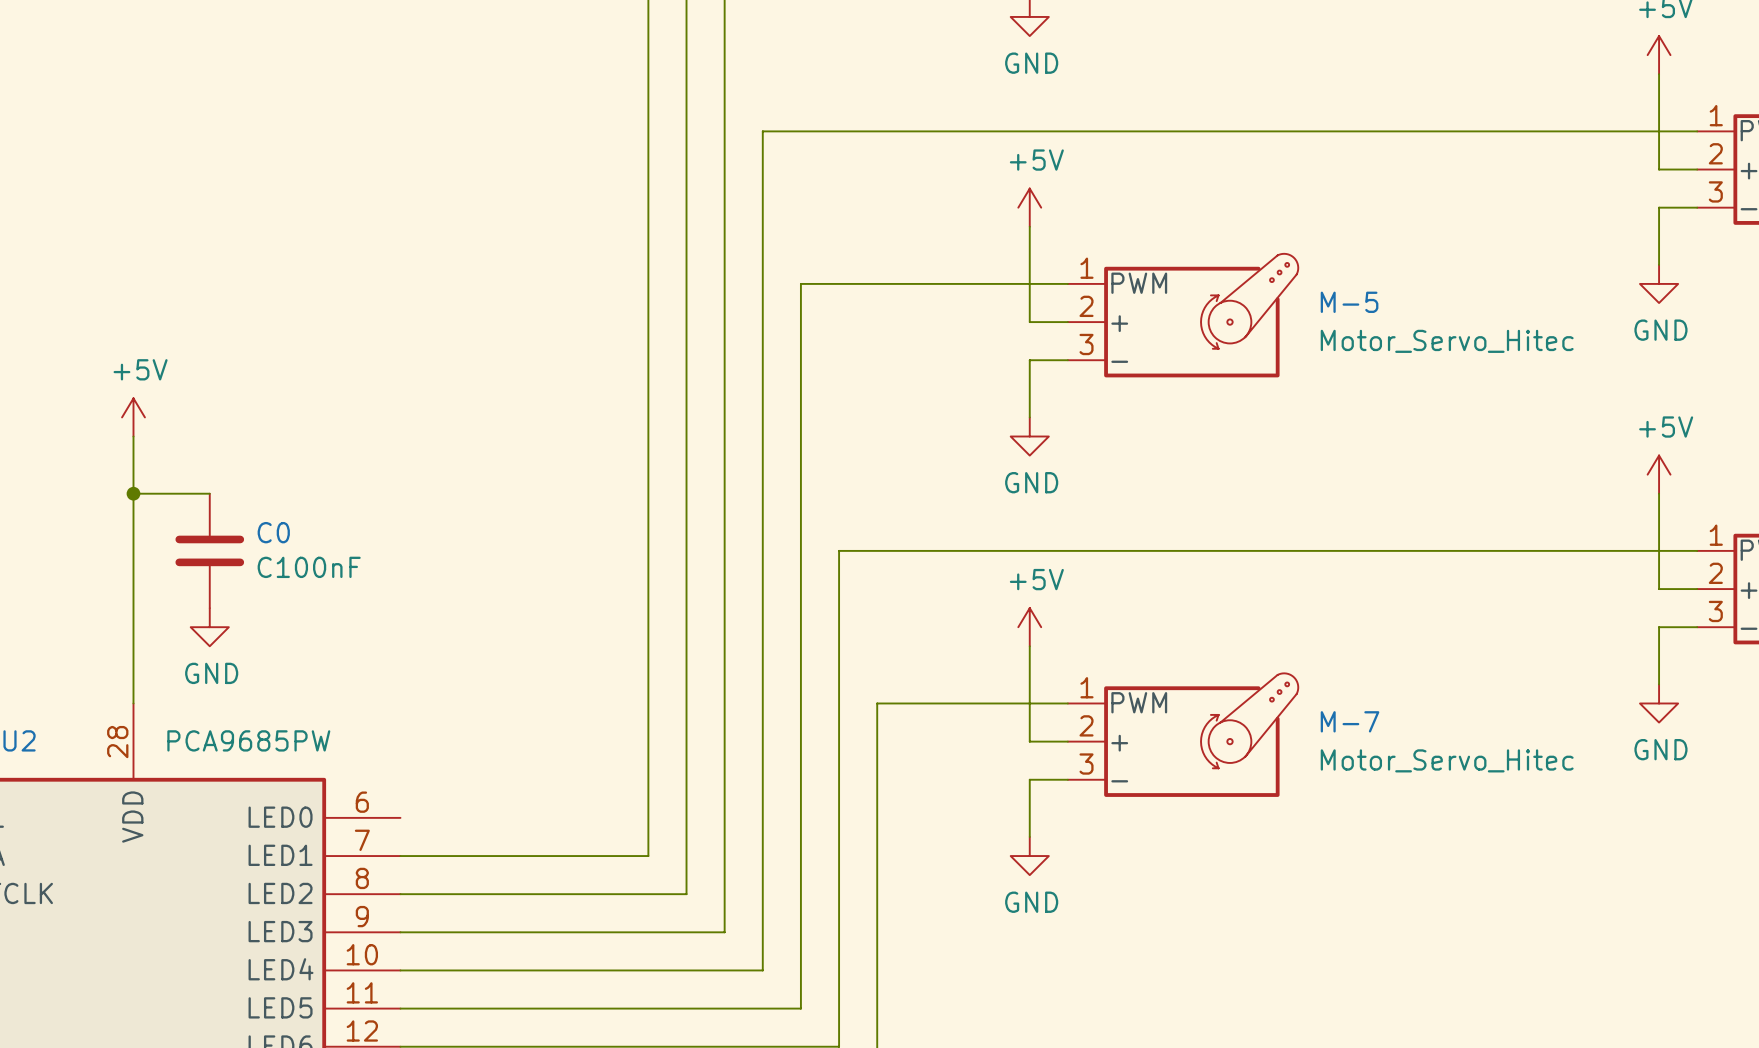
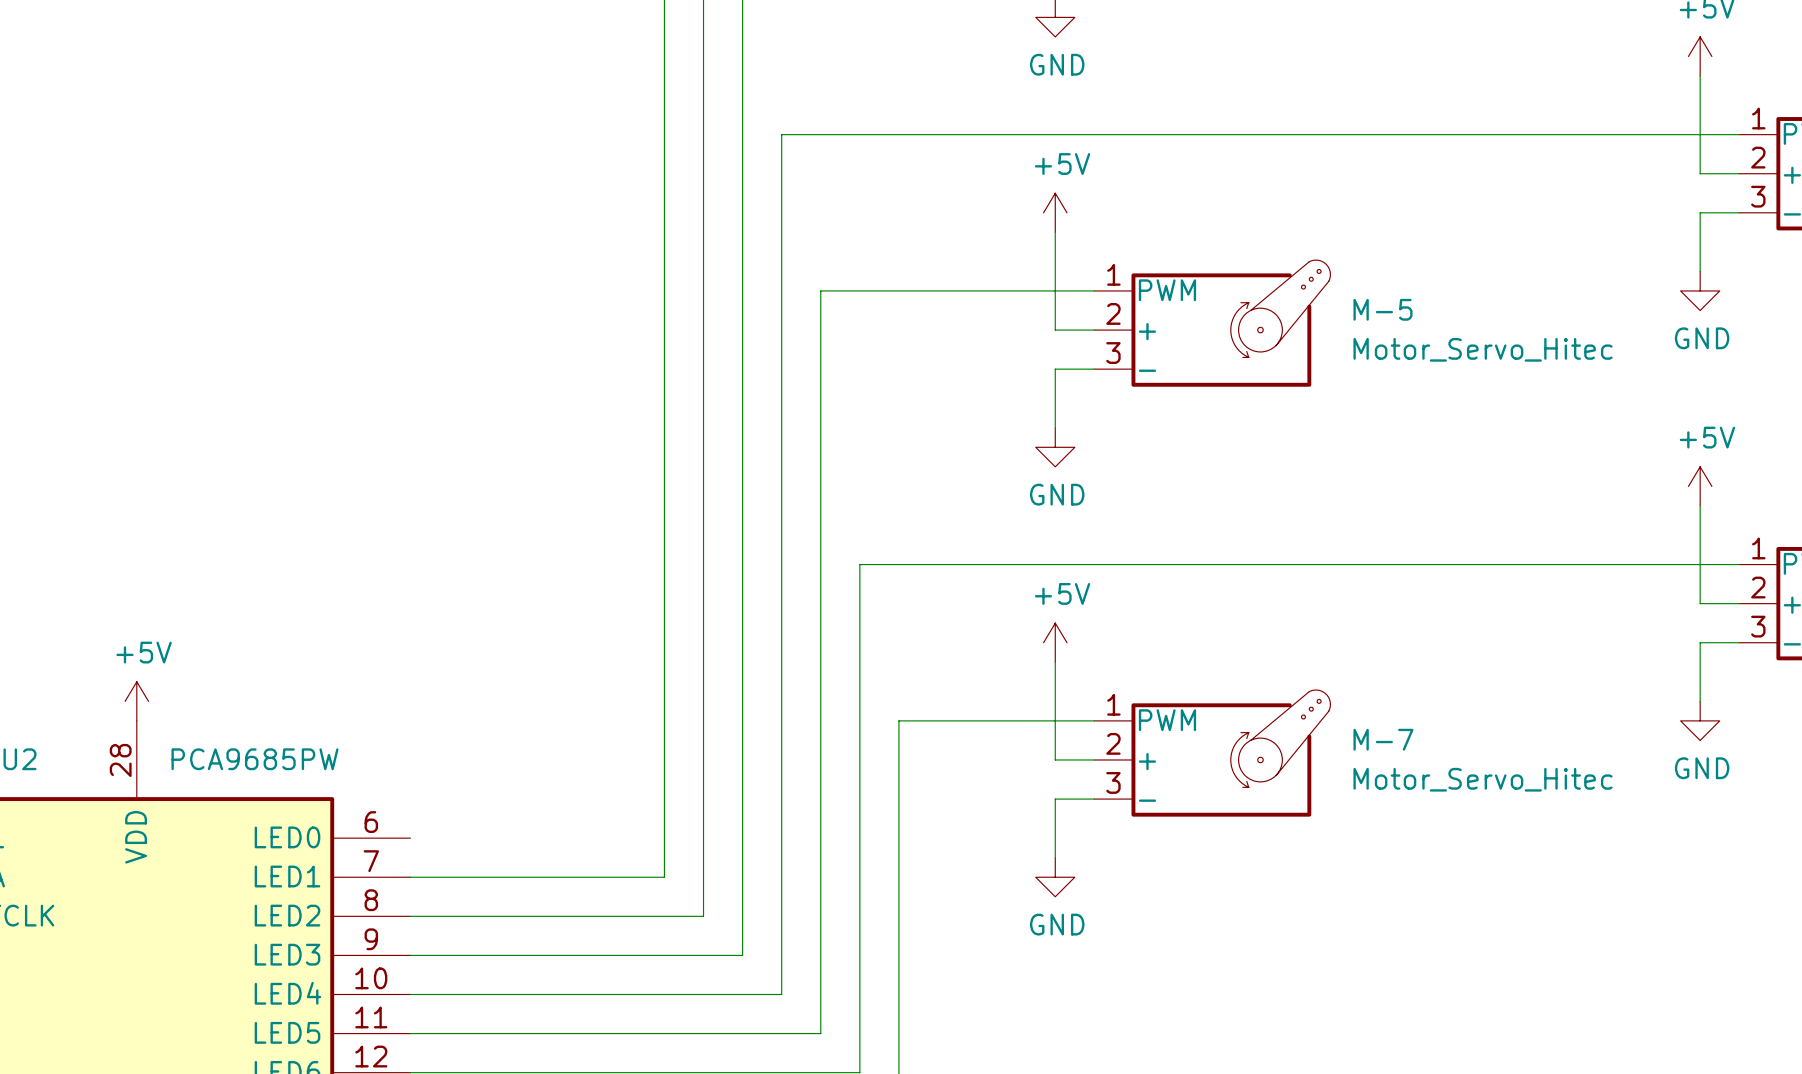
power symbol position: +5V (133, 417) -> +5V (136, 701)
wire: (133, 436) (133, 703) -> none
wire: (133, 493) (209, 493) -> none
junction: (133, 493) -> none
C0: C100nF (209, 550) -> none
power symbol: GND (209, 627) -> none

